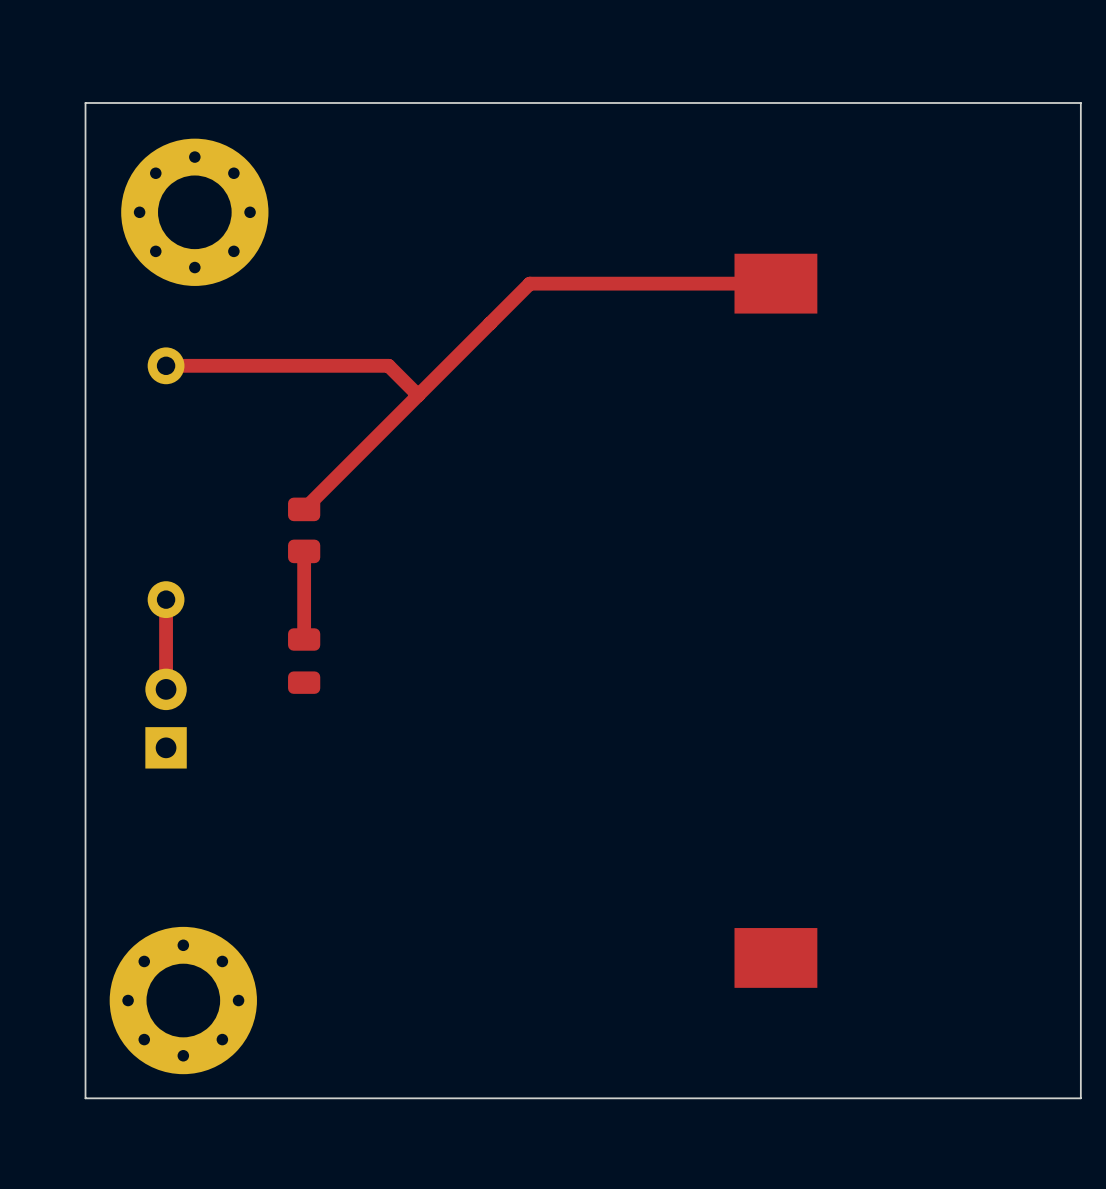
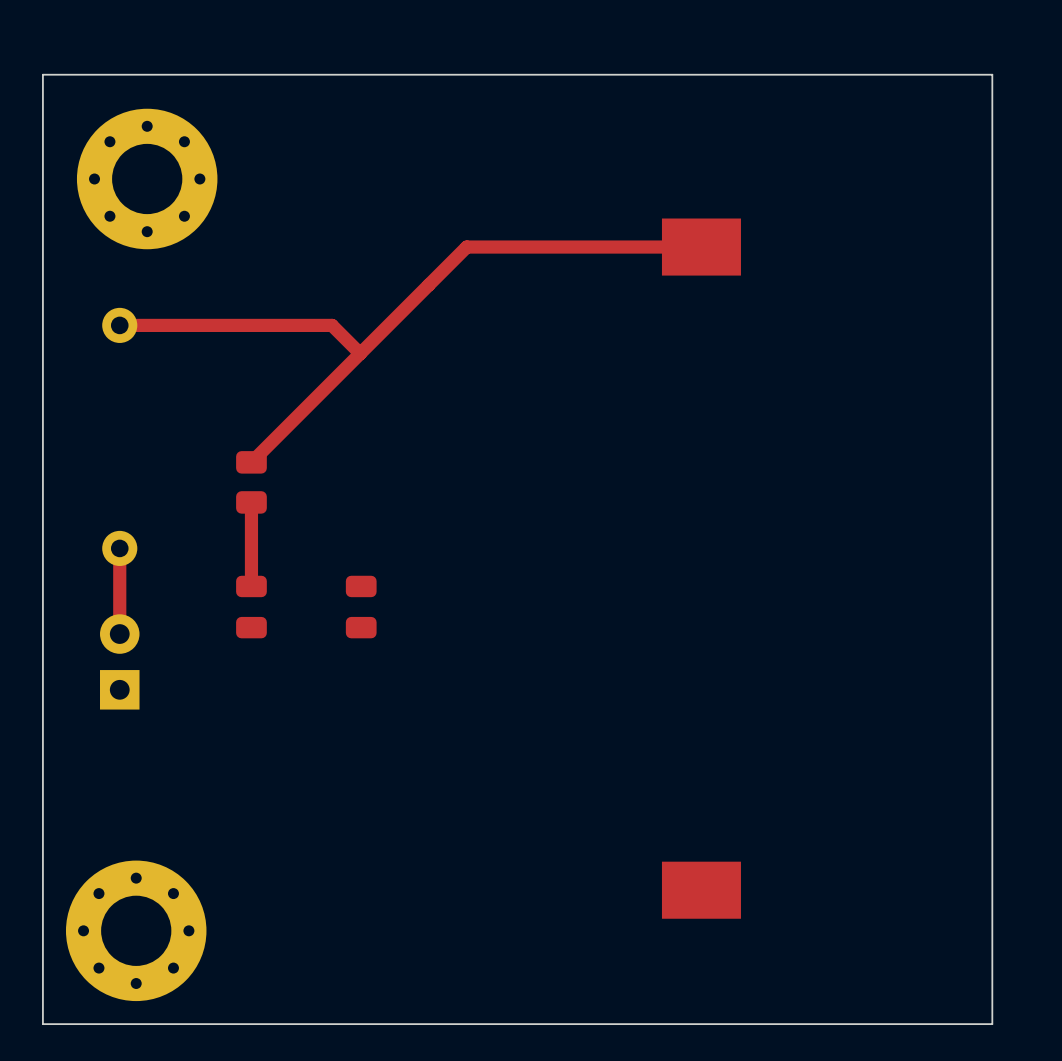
part: none -> (361, 607)

